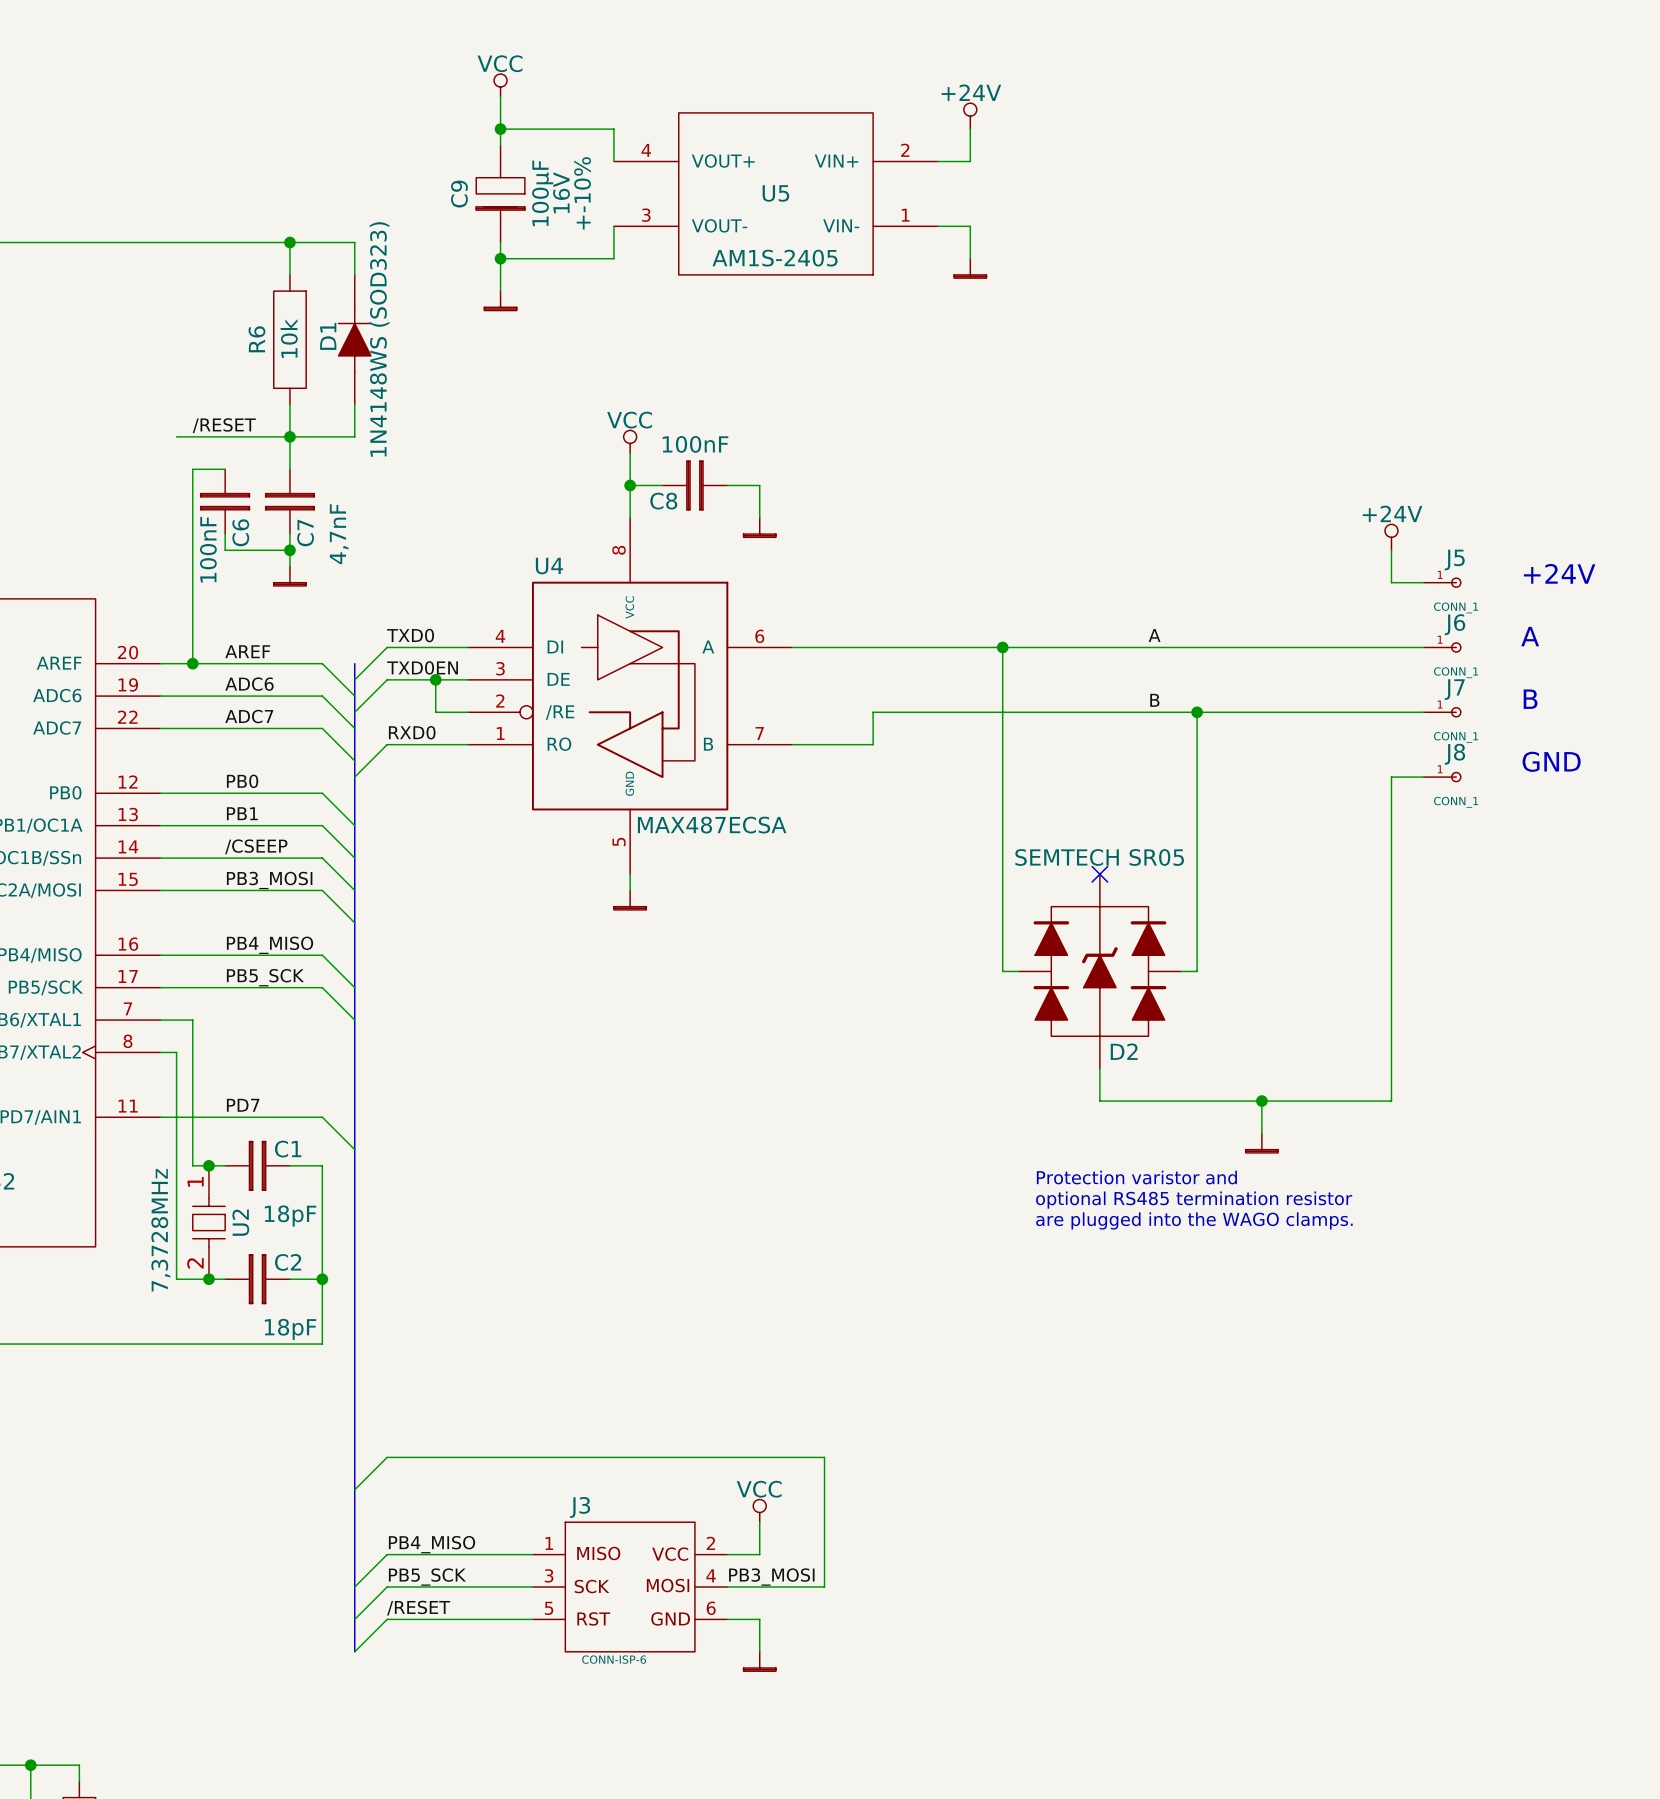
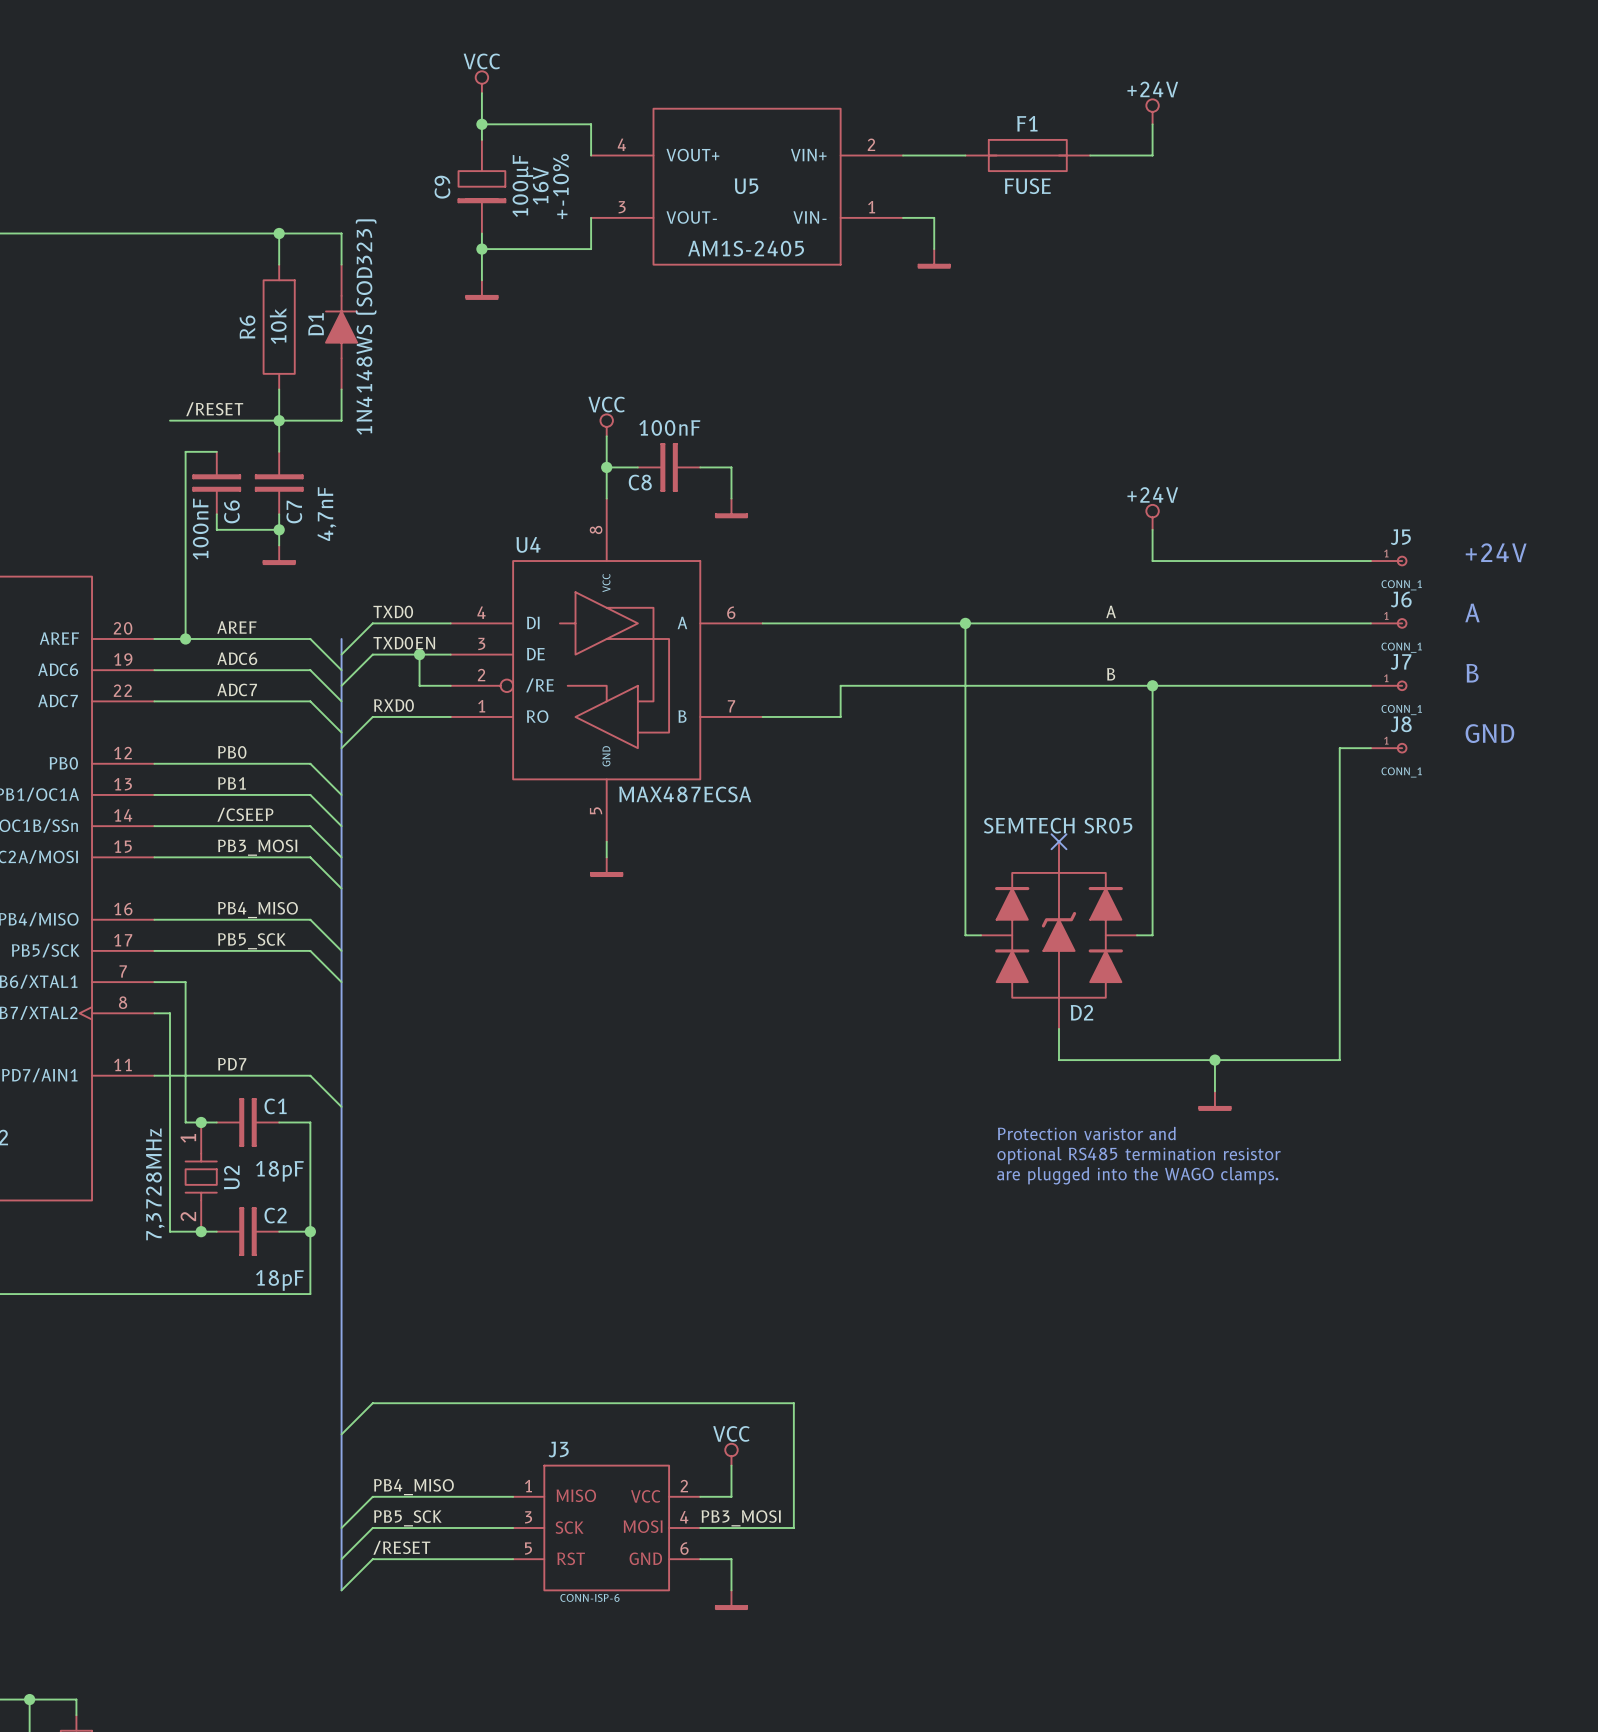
power symbol position: +24V (970, 116) -> +24V (1152, 111)
wire: (970, 129) (970, 161) -> (965, 155) (934, 155)
wire: none -> (1152, 124) (1152, 155) (1090, 155)
F1: none -> FUSE (1027, 155)
power symbol position: +24V (1391, 537) -> +24V (1152, 517)
wire: (1391, 550) (1391, 582) -> (1152, 529) (1152, 561) (1339, 561)

